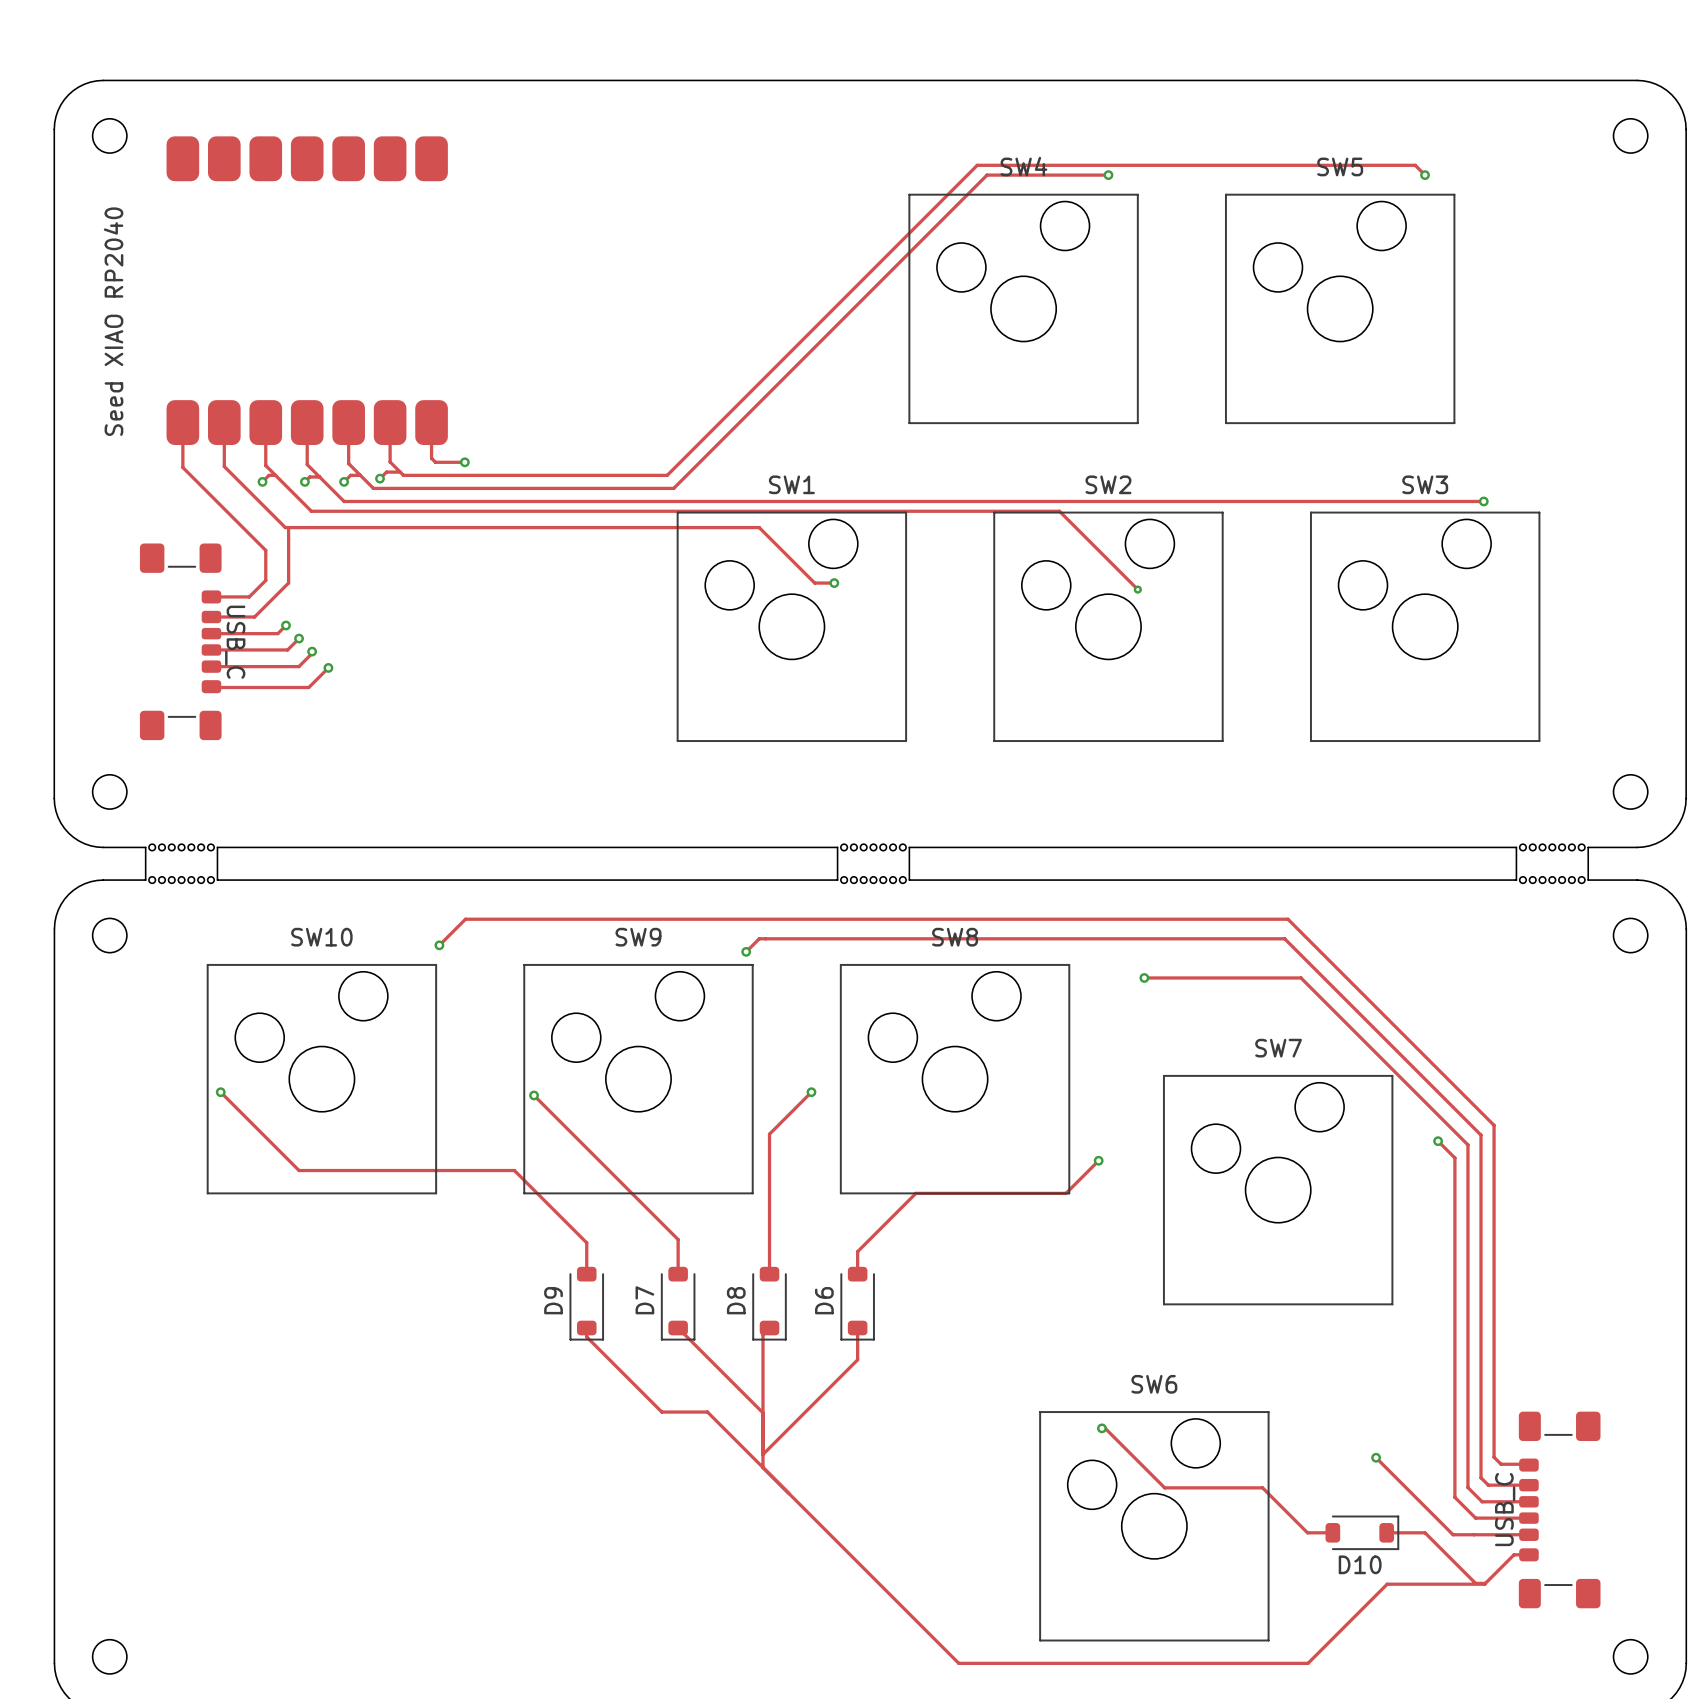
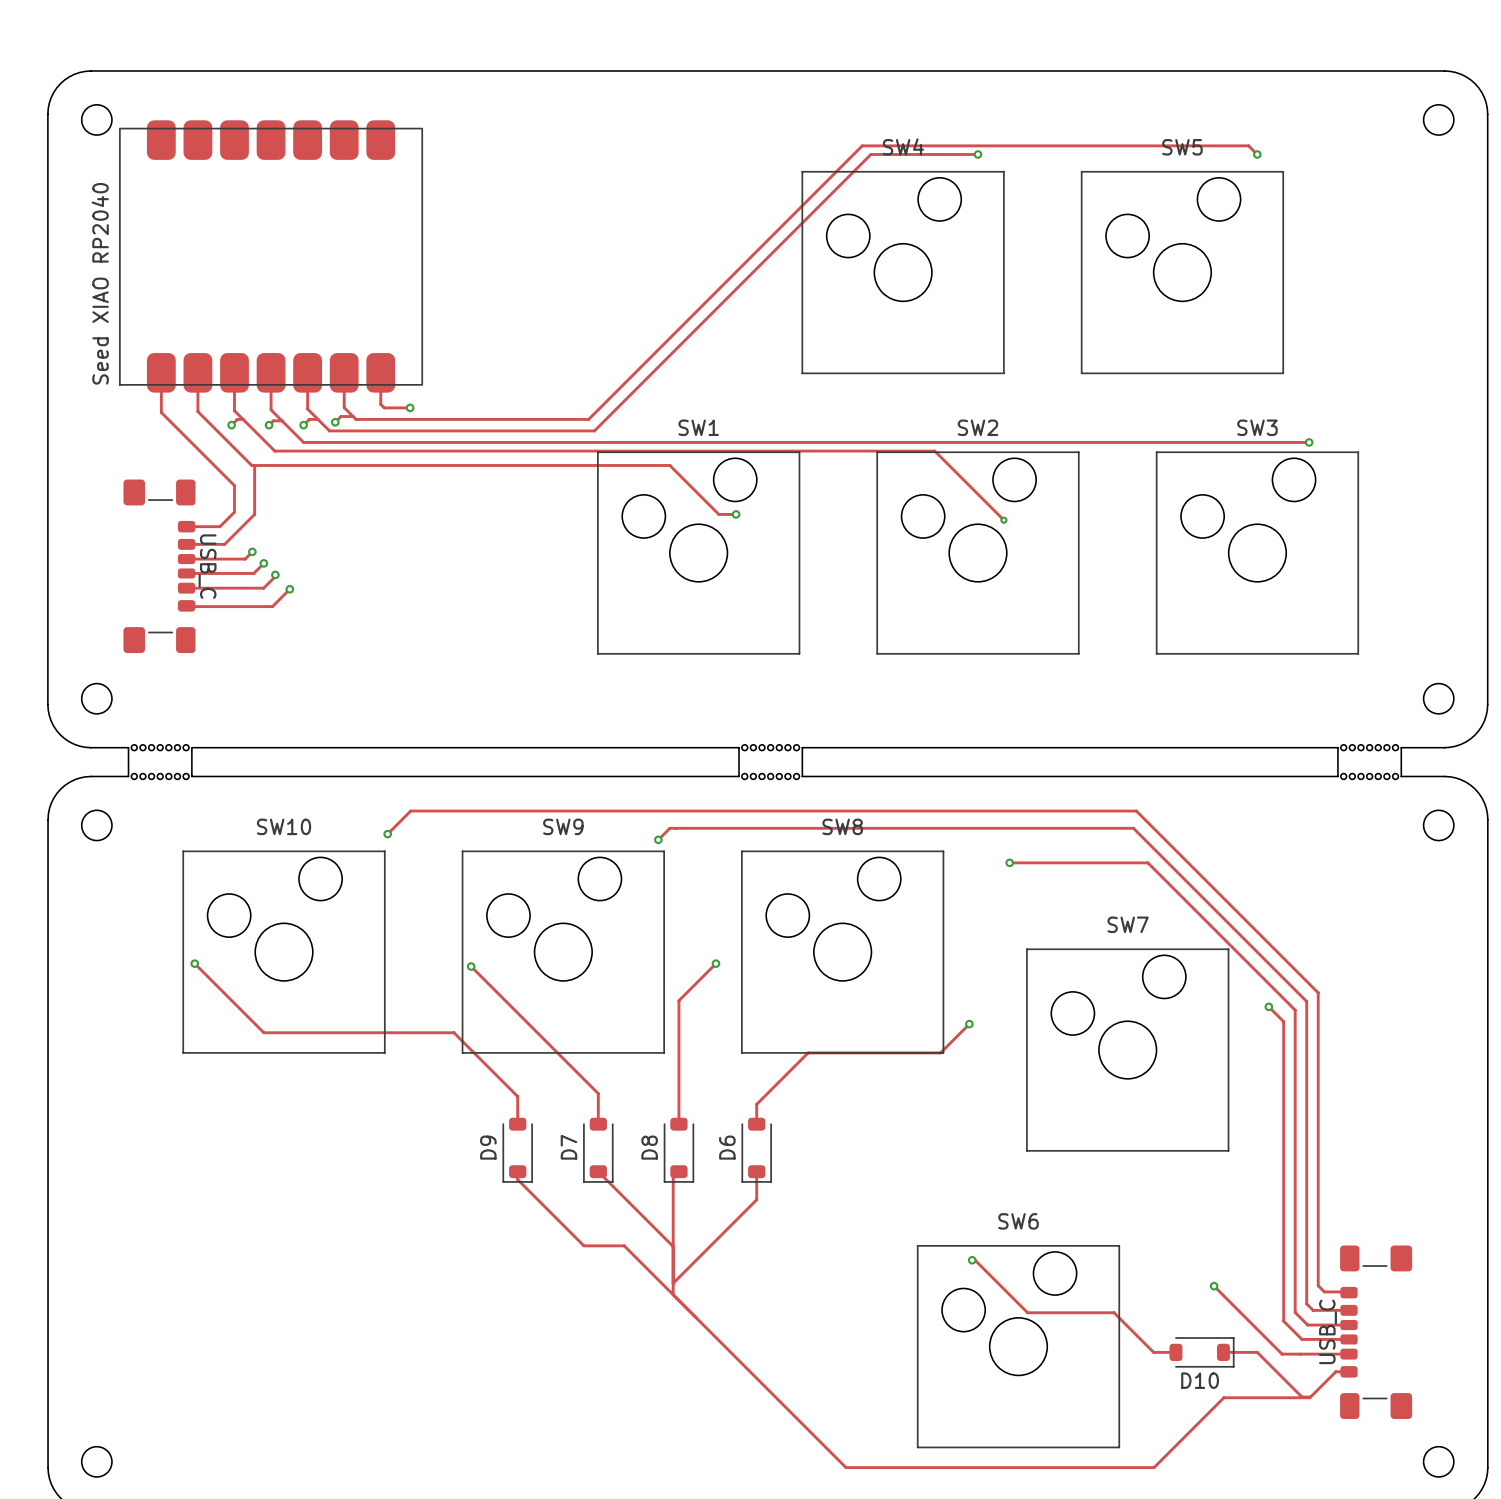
Seed XIAO RP2040 footprint: [166, 136, 448, 446] -> [119, 120, 424, 393]

